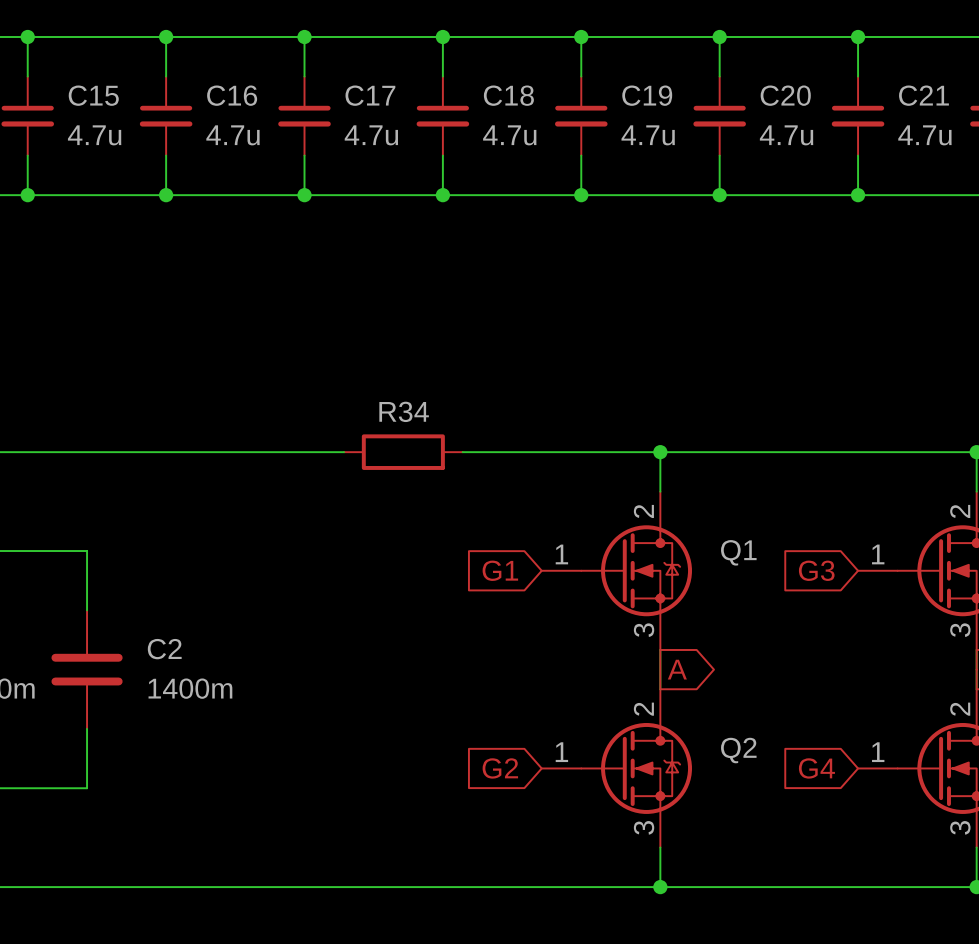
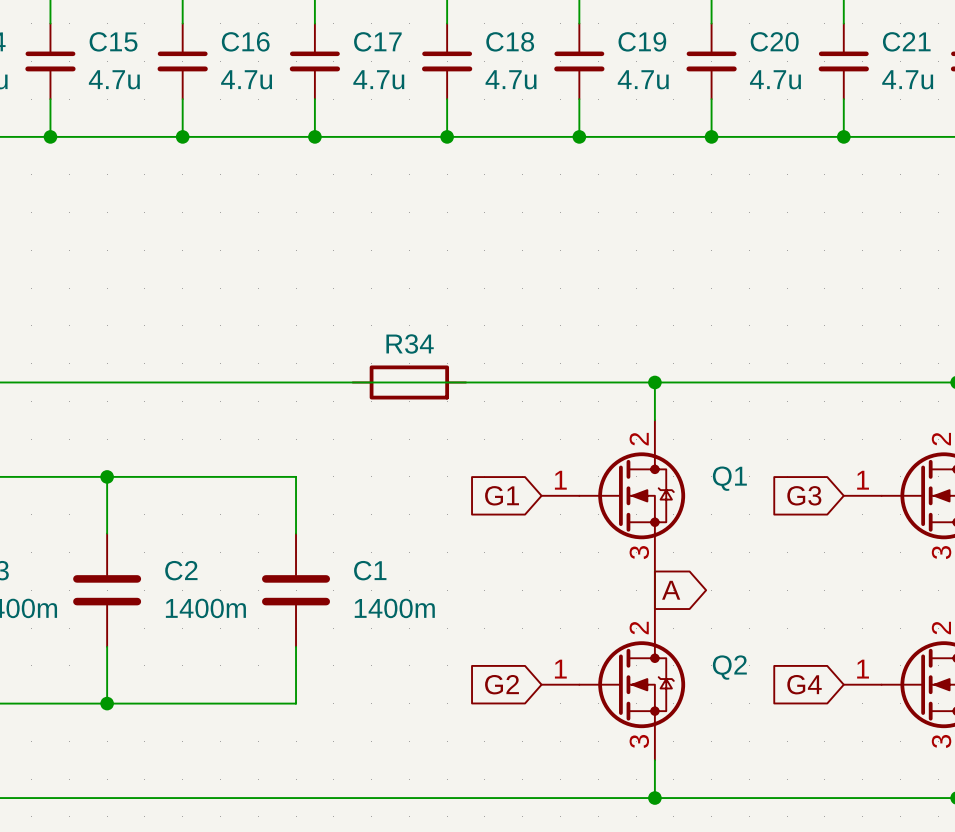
wire: none -> (352, 382) (466, 382)
wire: none -> (107, 476) (296, 476) (296, 533)
junction: none -> (107, 476)
C1: none -> 1400m (296, 590)
wire: none -> (296, 646) (296, 703) (107, 703)
junction: none -> (107, 703)

